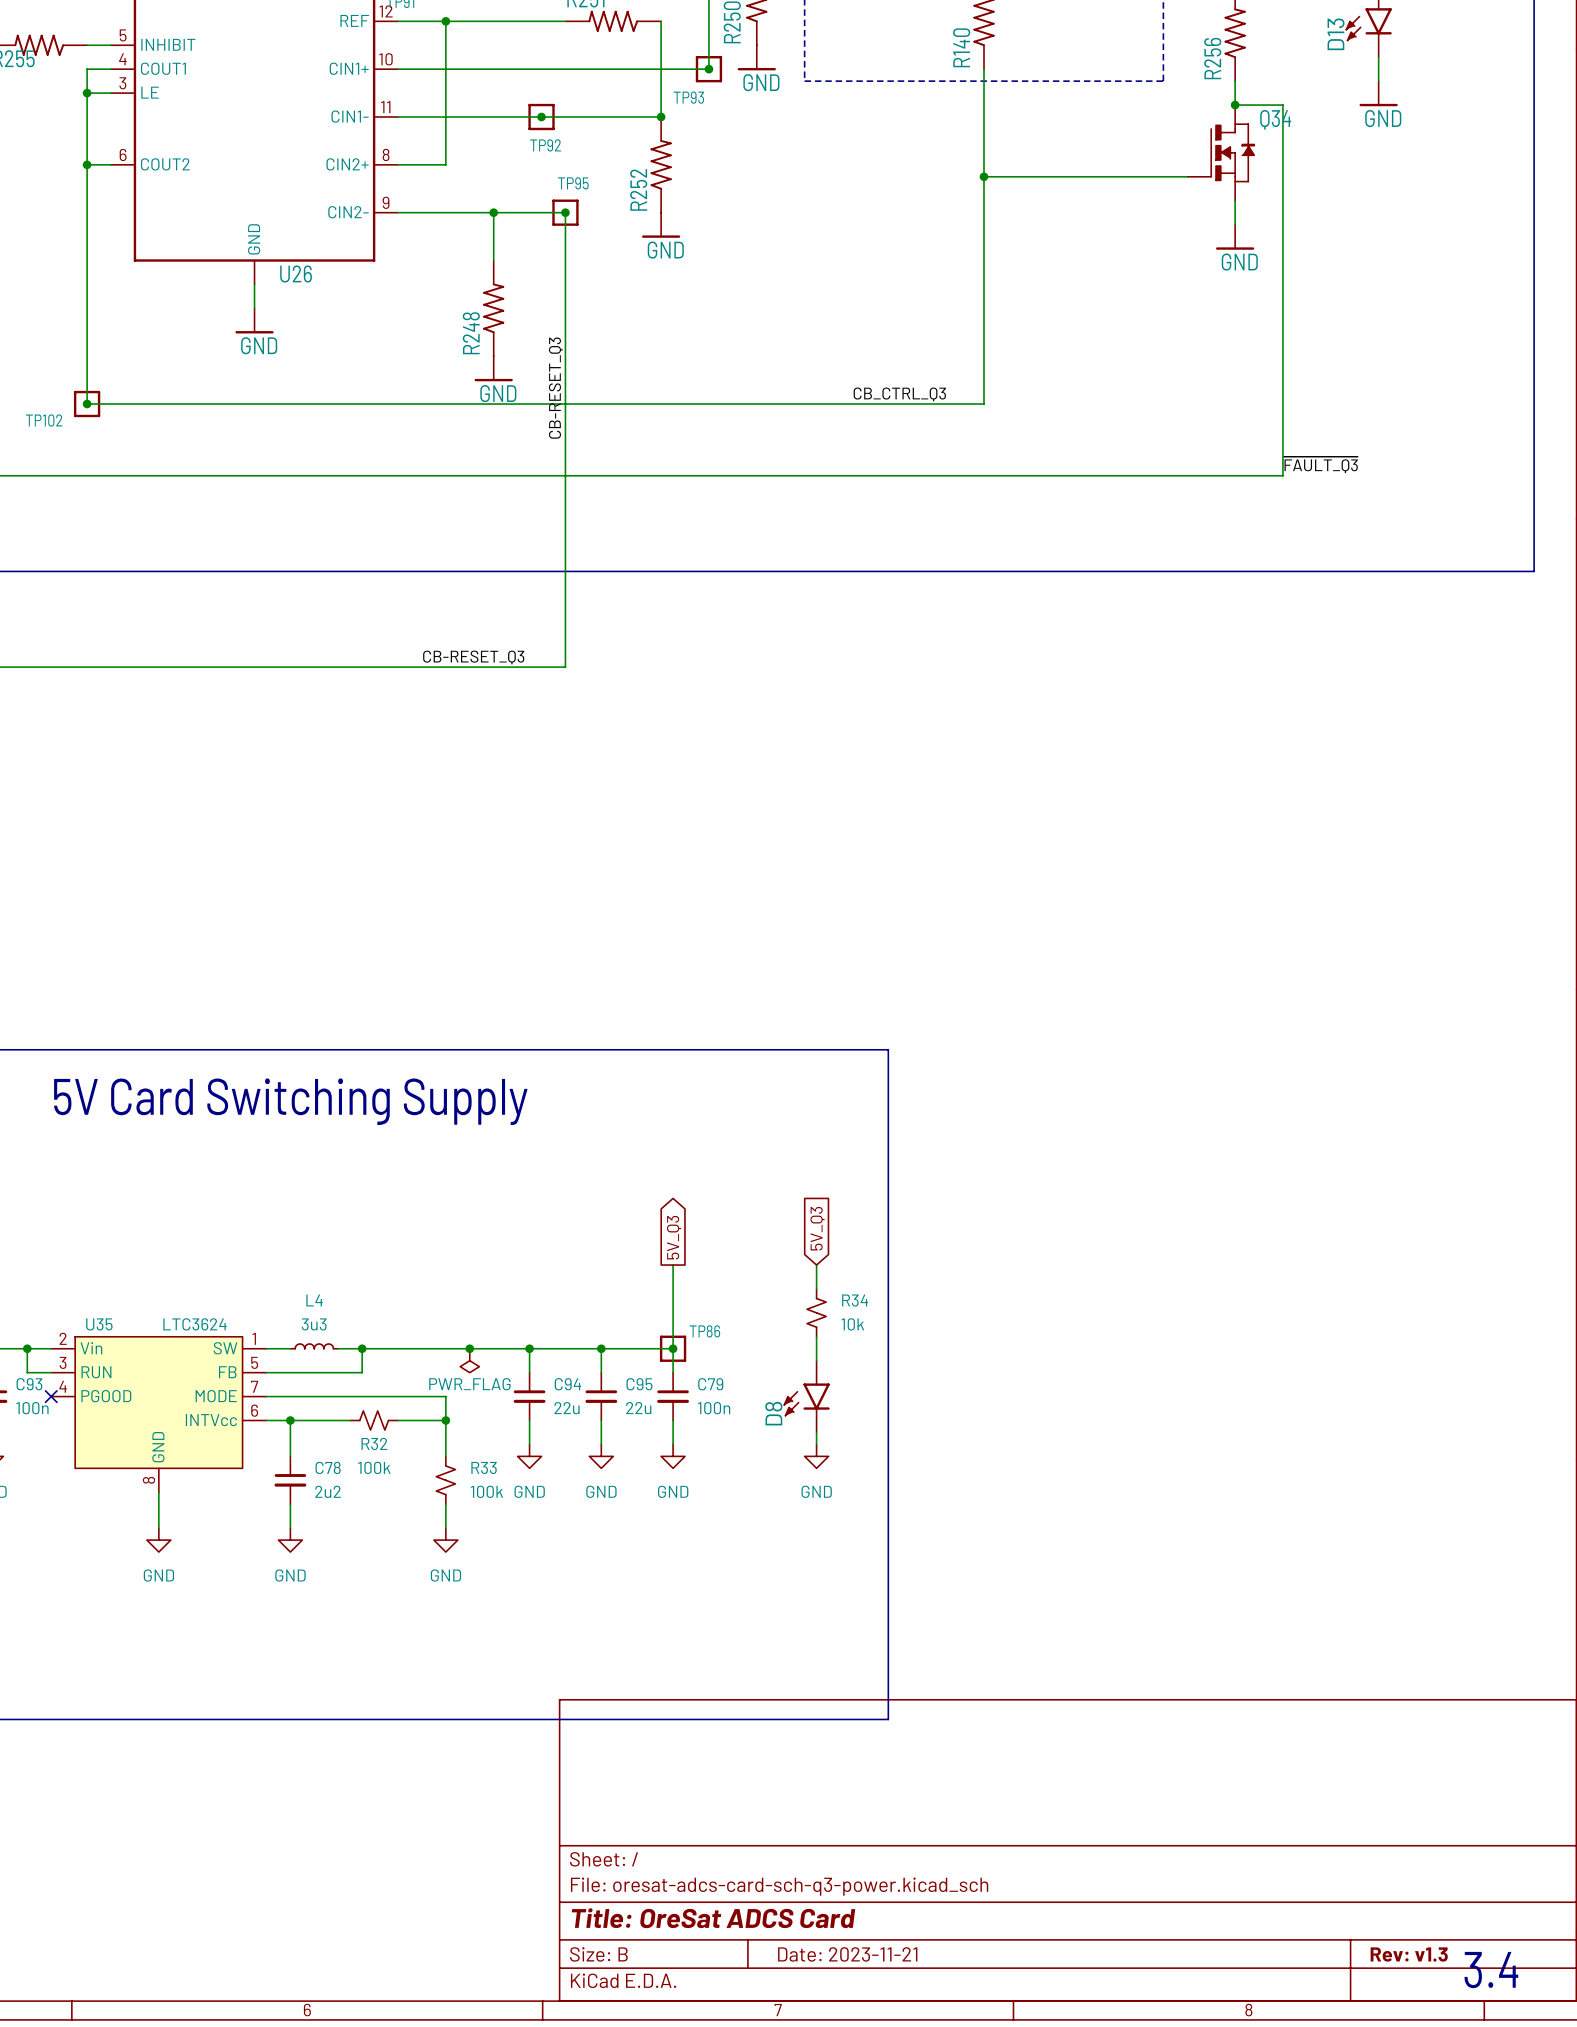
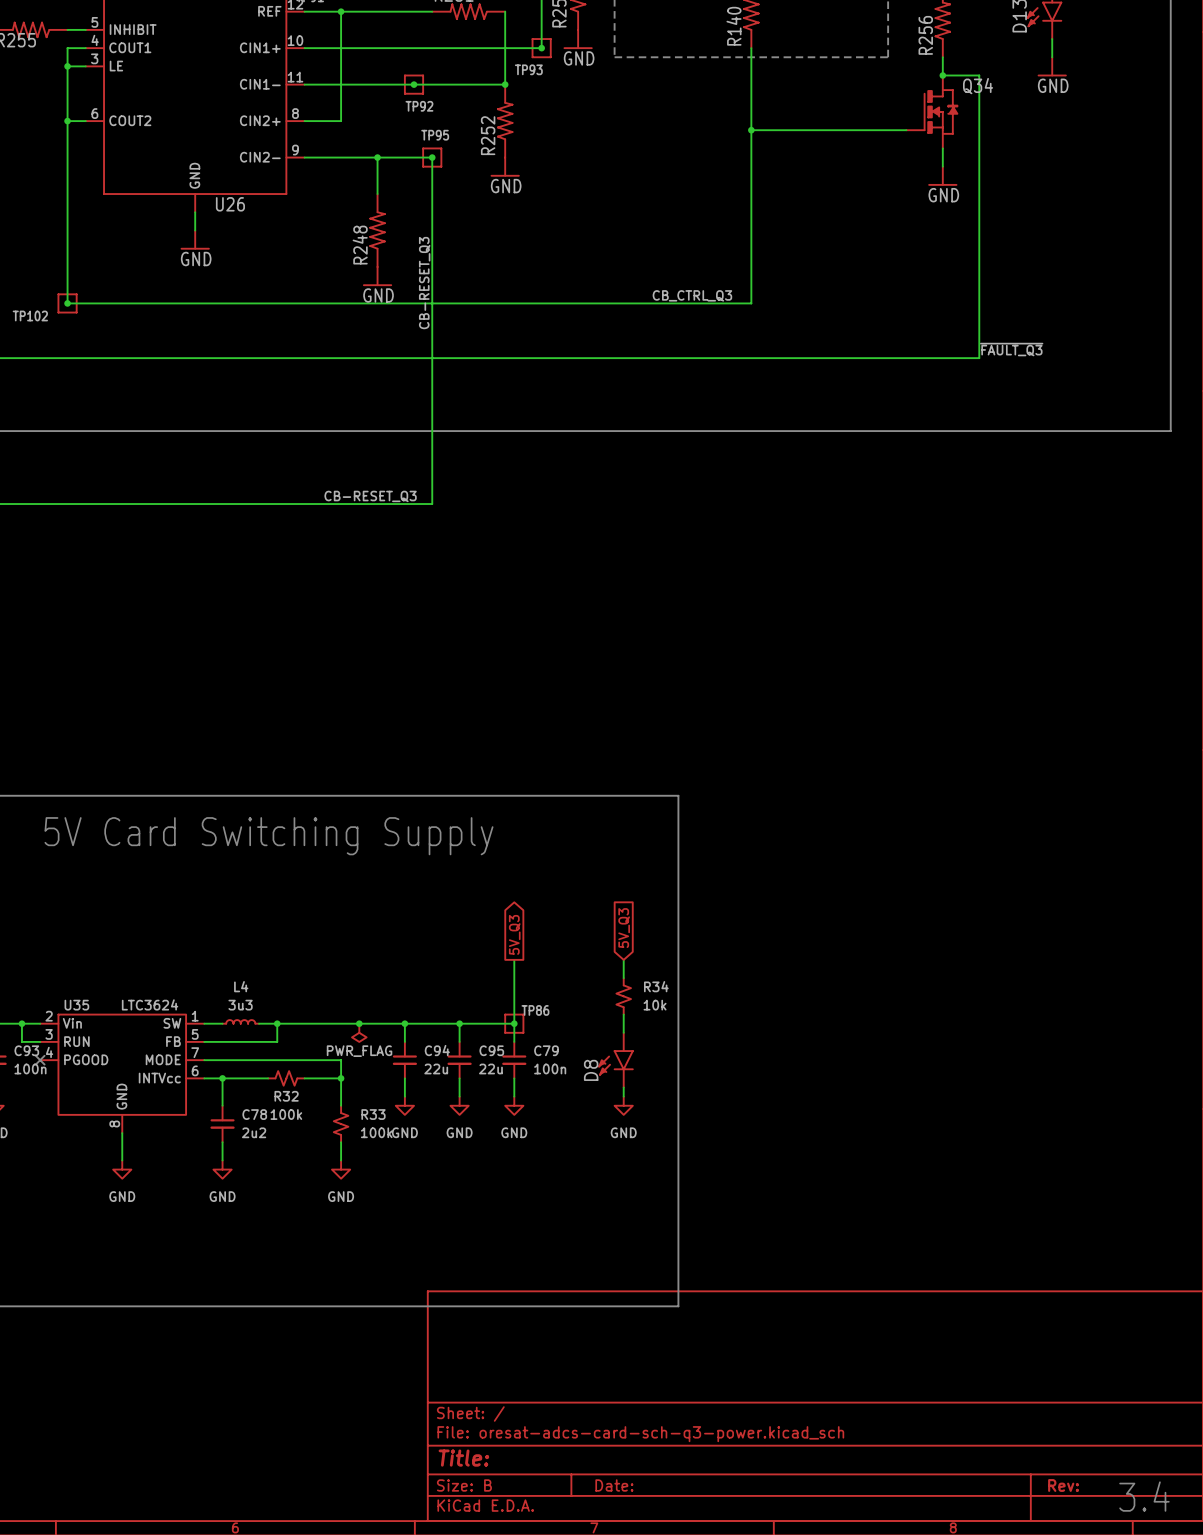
title block: Title: OreSat ADCS Card (713, 1918) -> Title: (463, 1458)
title block: Date: 2023-11-21 (847, 1954) -> Date: (614, 1485)
title block: Rev: v1.3 (1409, 1954) -> Rev: (1063, 1485)

